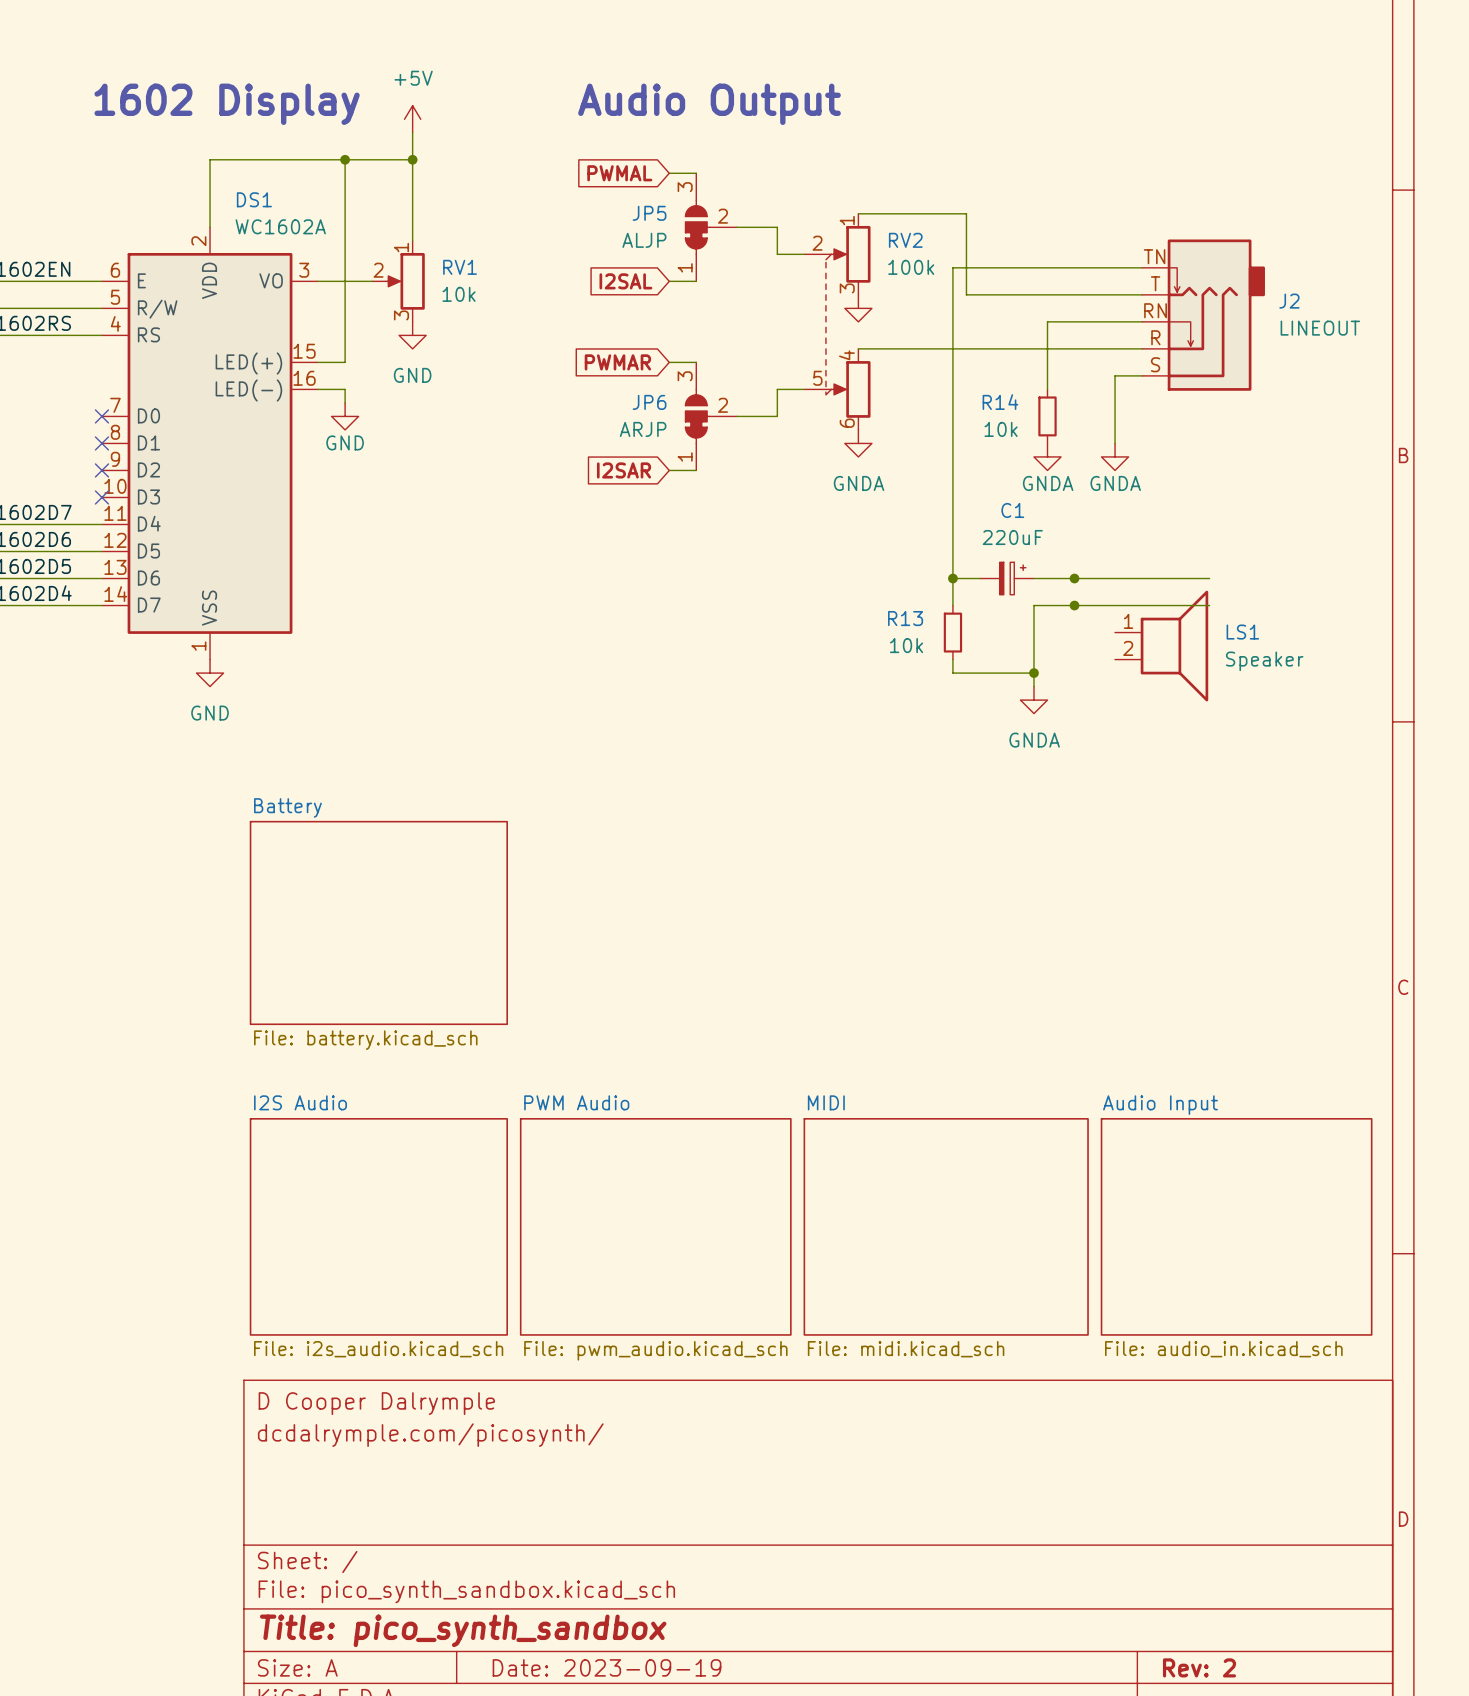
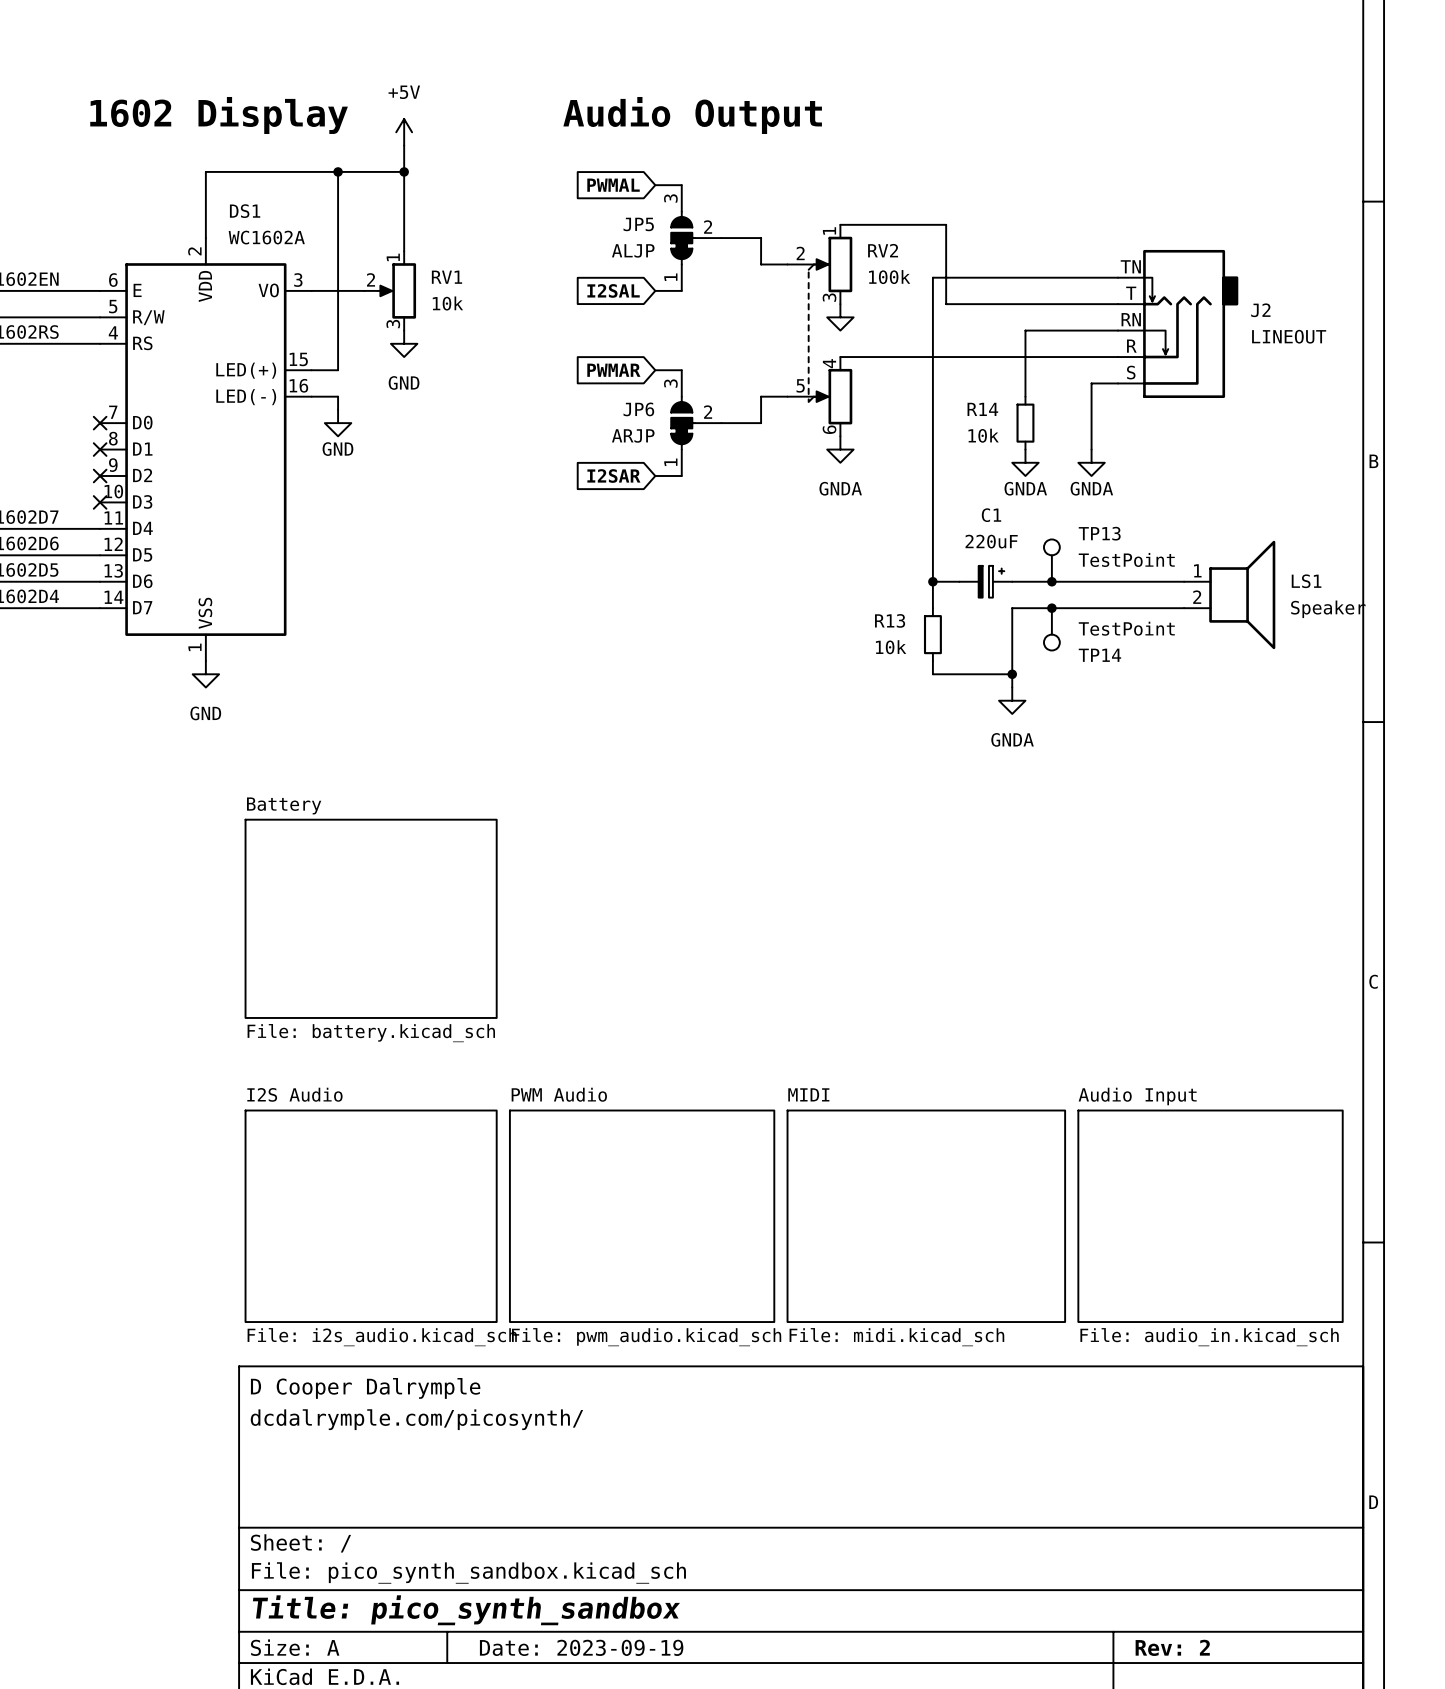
TP13: none -> TestPoint (1051, 560)
TP14: none -> TestPoint (1051, 629)
LS1 position: (1161, 646) -> (1229, 594)

